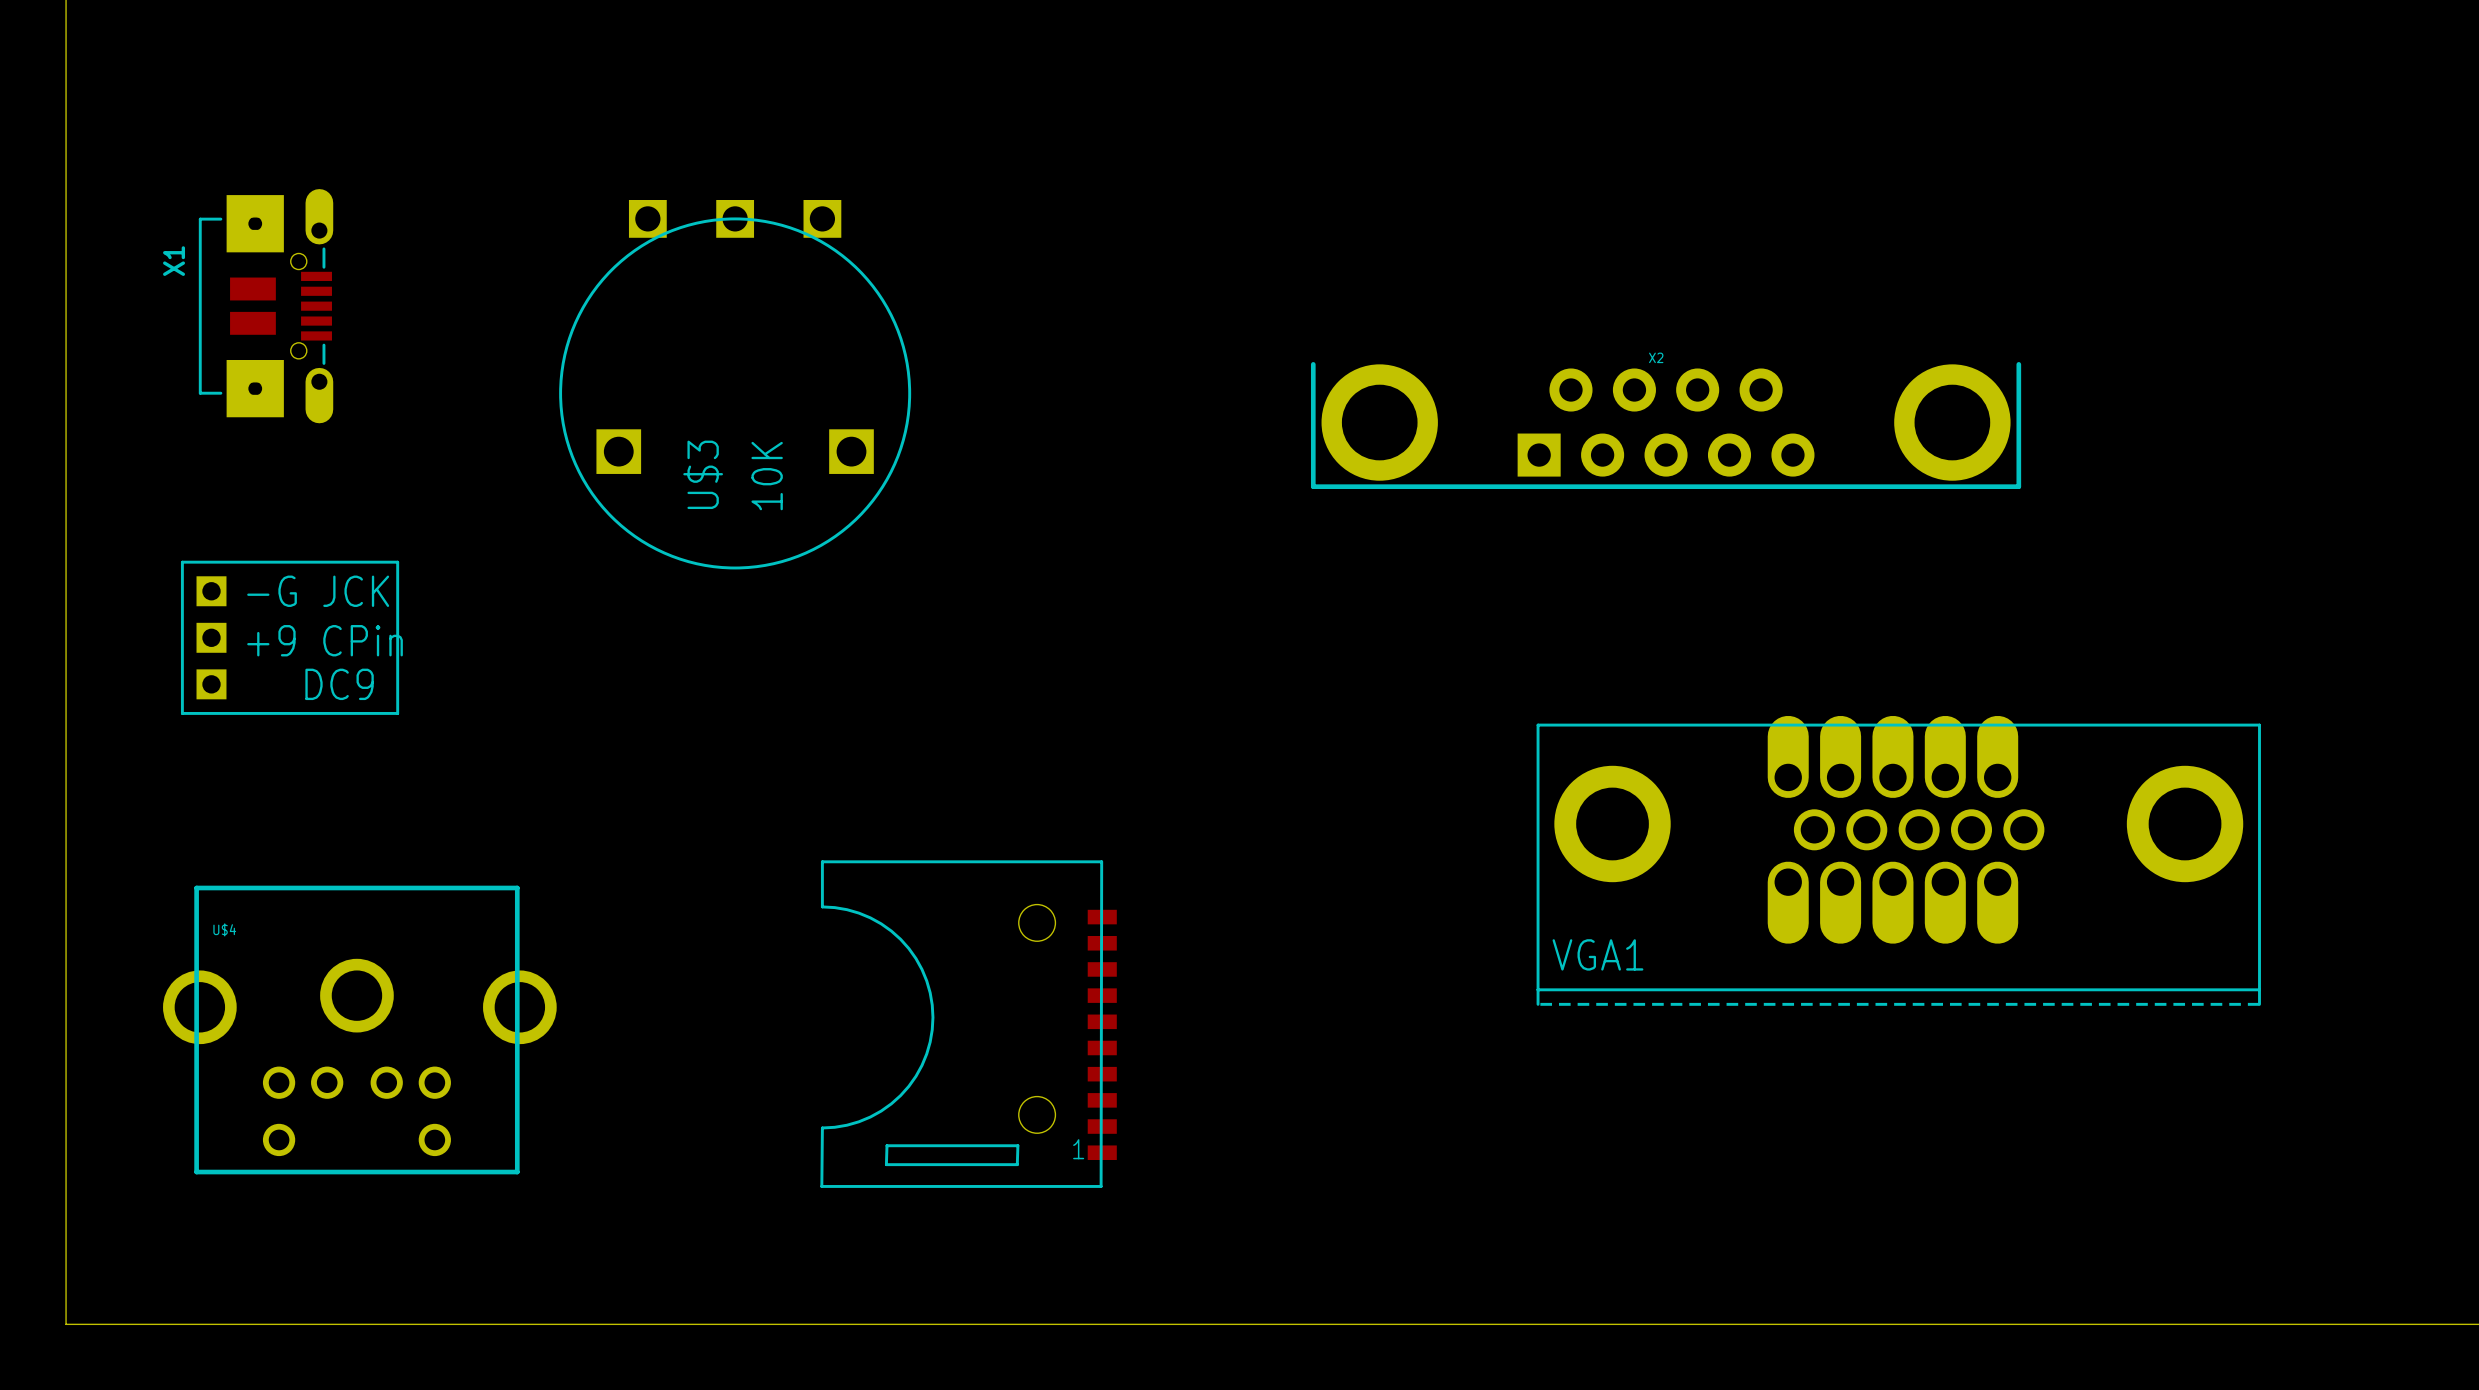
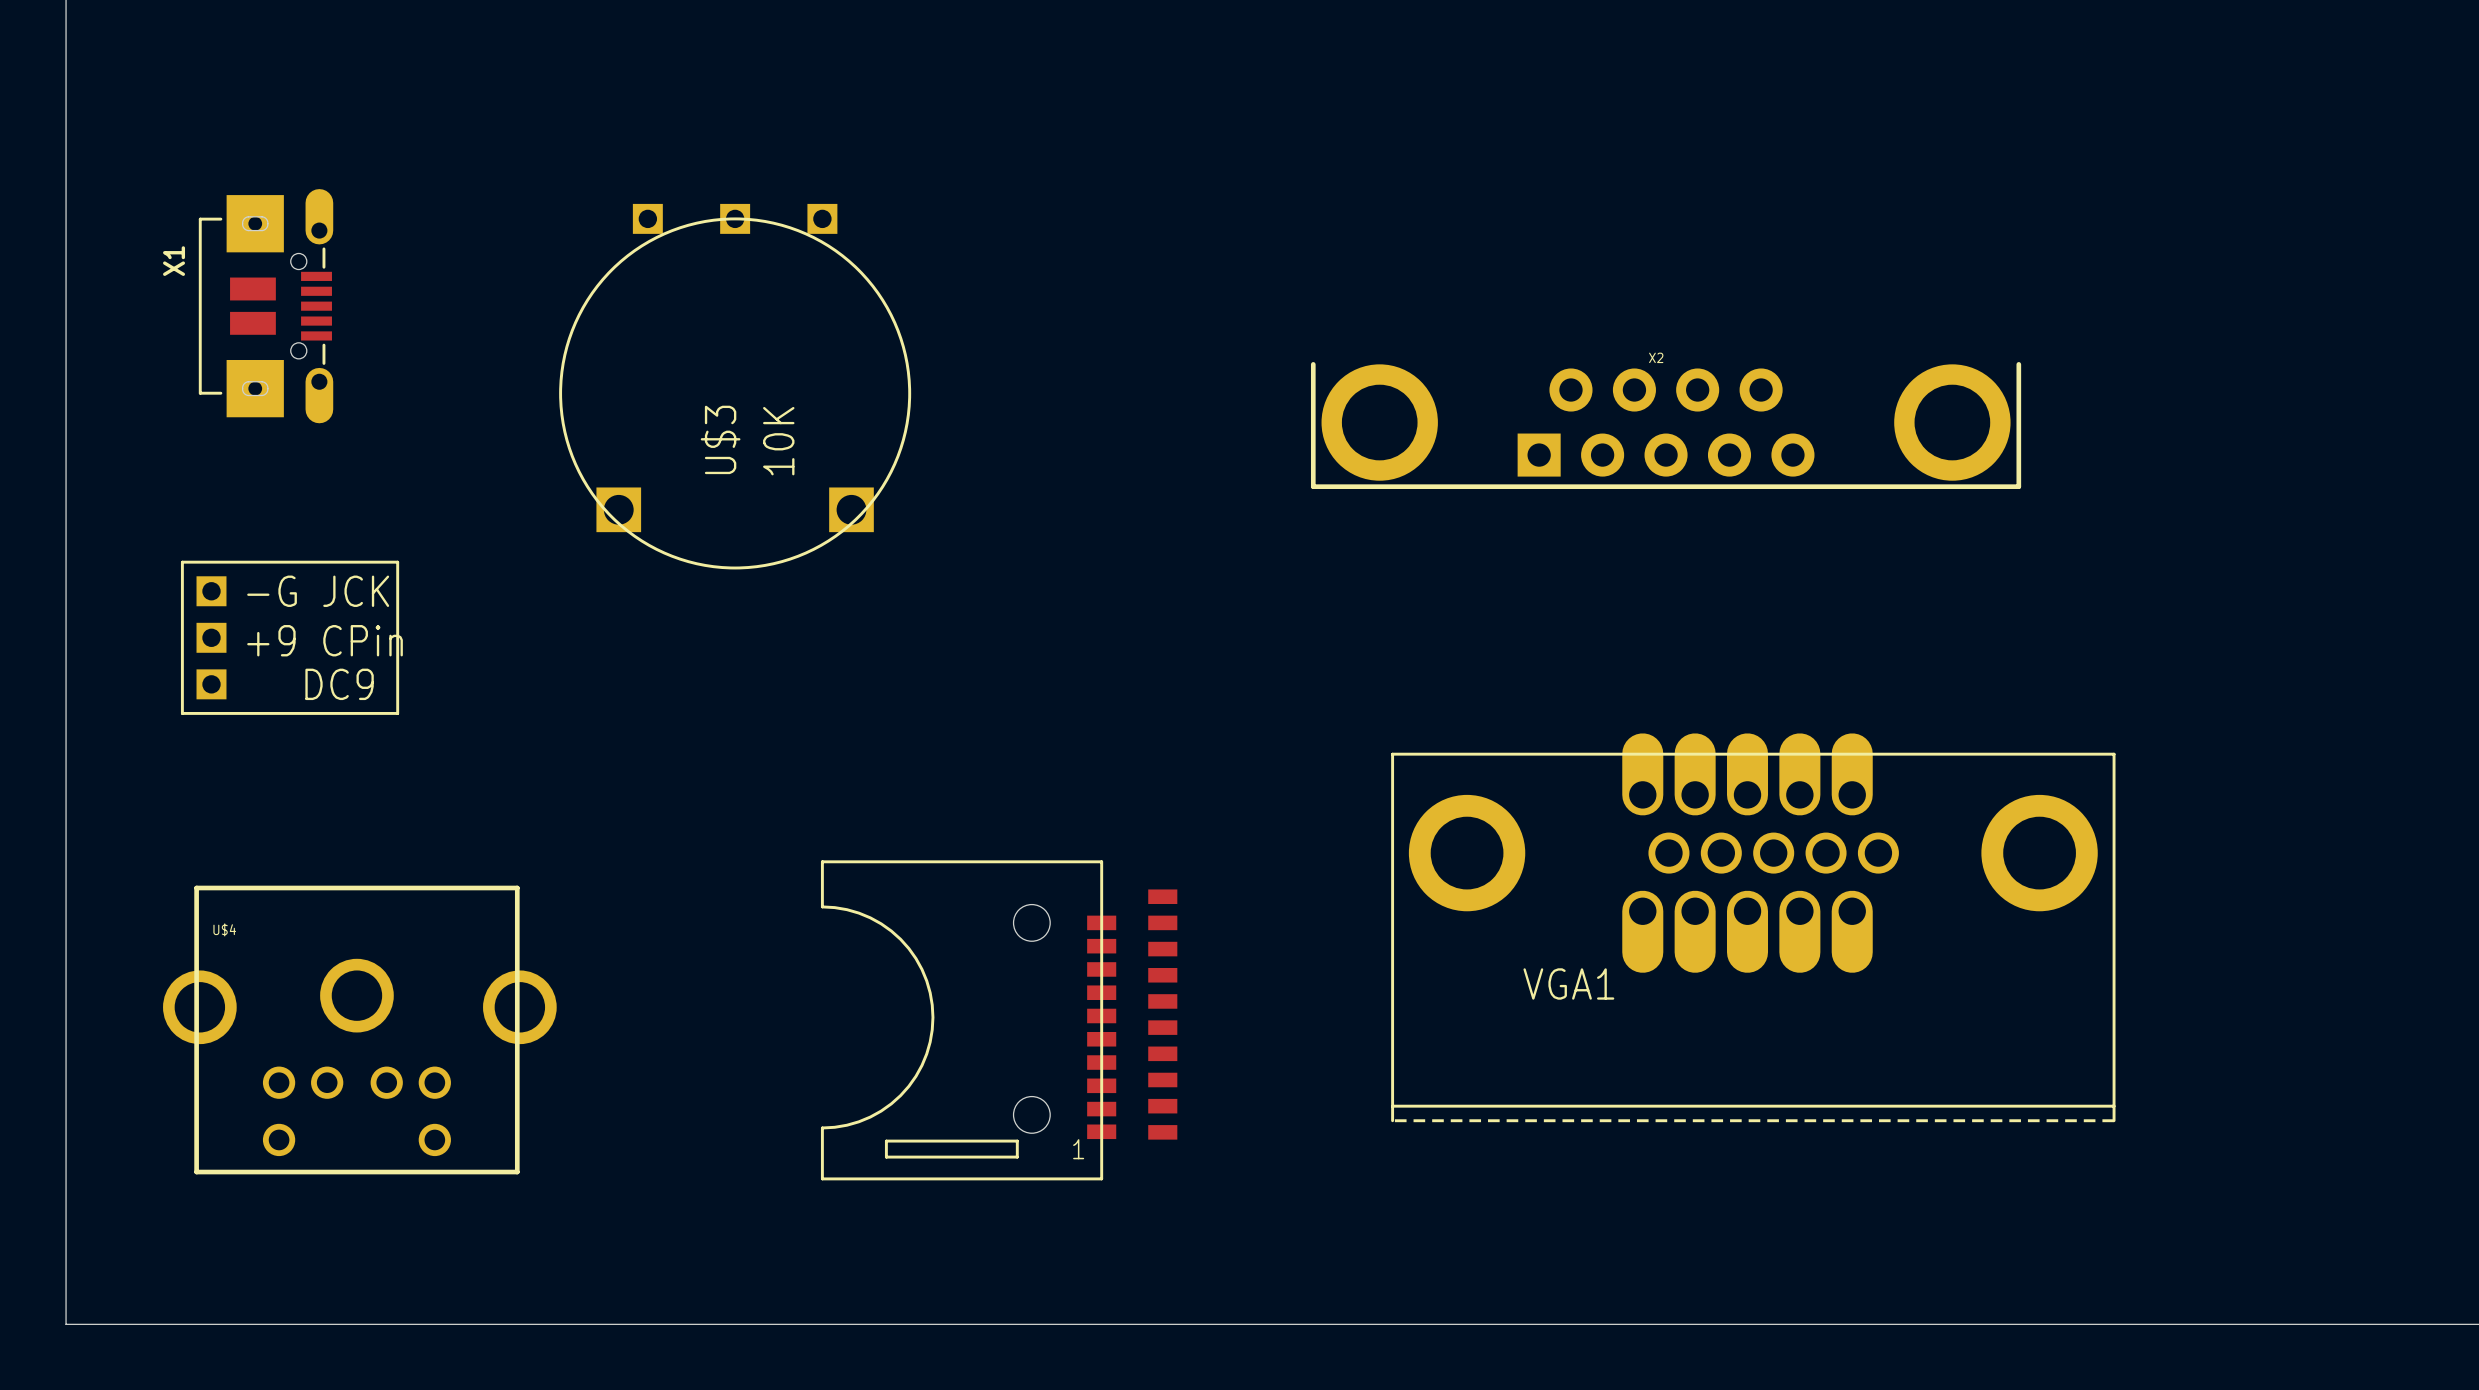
U$3 footprint: [559, 200, 912, 570] -> [559, 203, 912, 570]
VGA1 footprint: [1536, 715, 2261, 1006] -> [1391, 733, 2116, 1123]
VGA1 name position: VGA1 (1597, 954) -> VGA1 (1568, 983)
part: none -> (999, 1020)
part: (968, 1024) -> none

